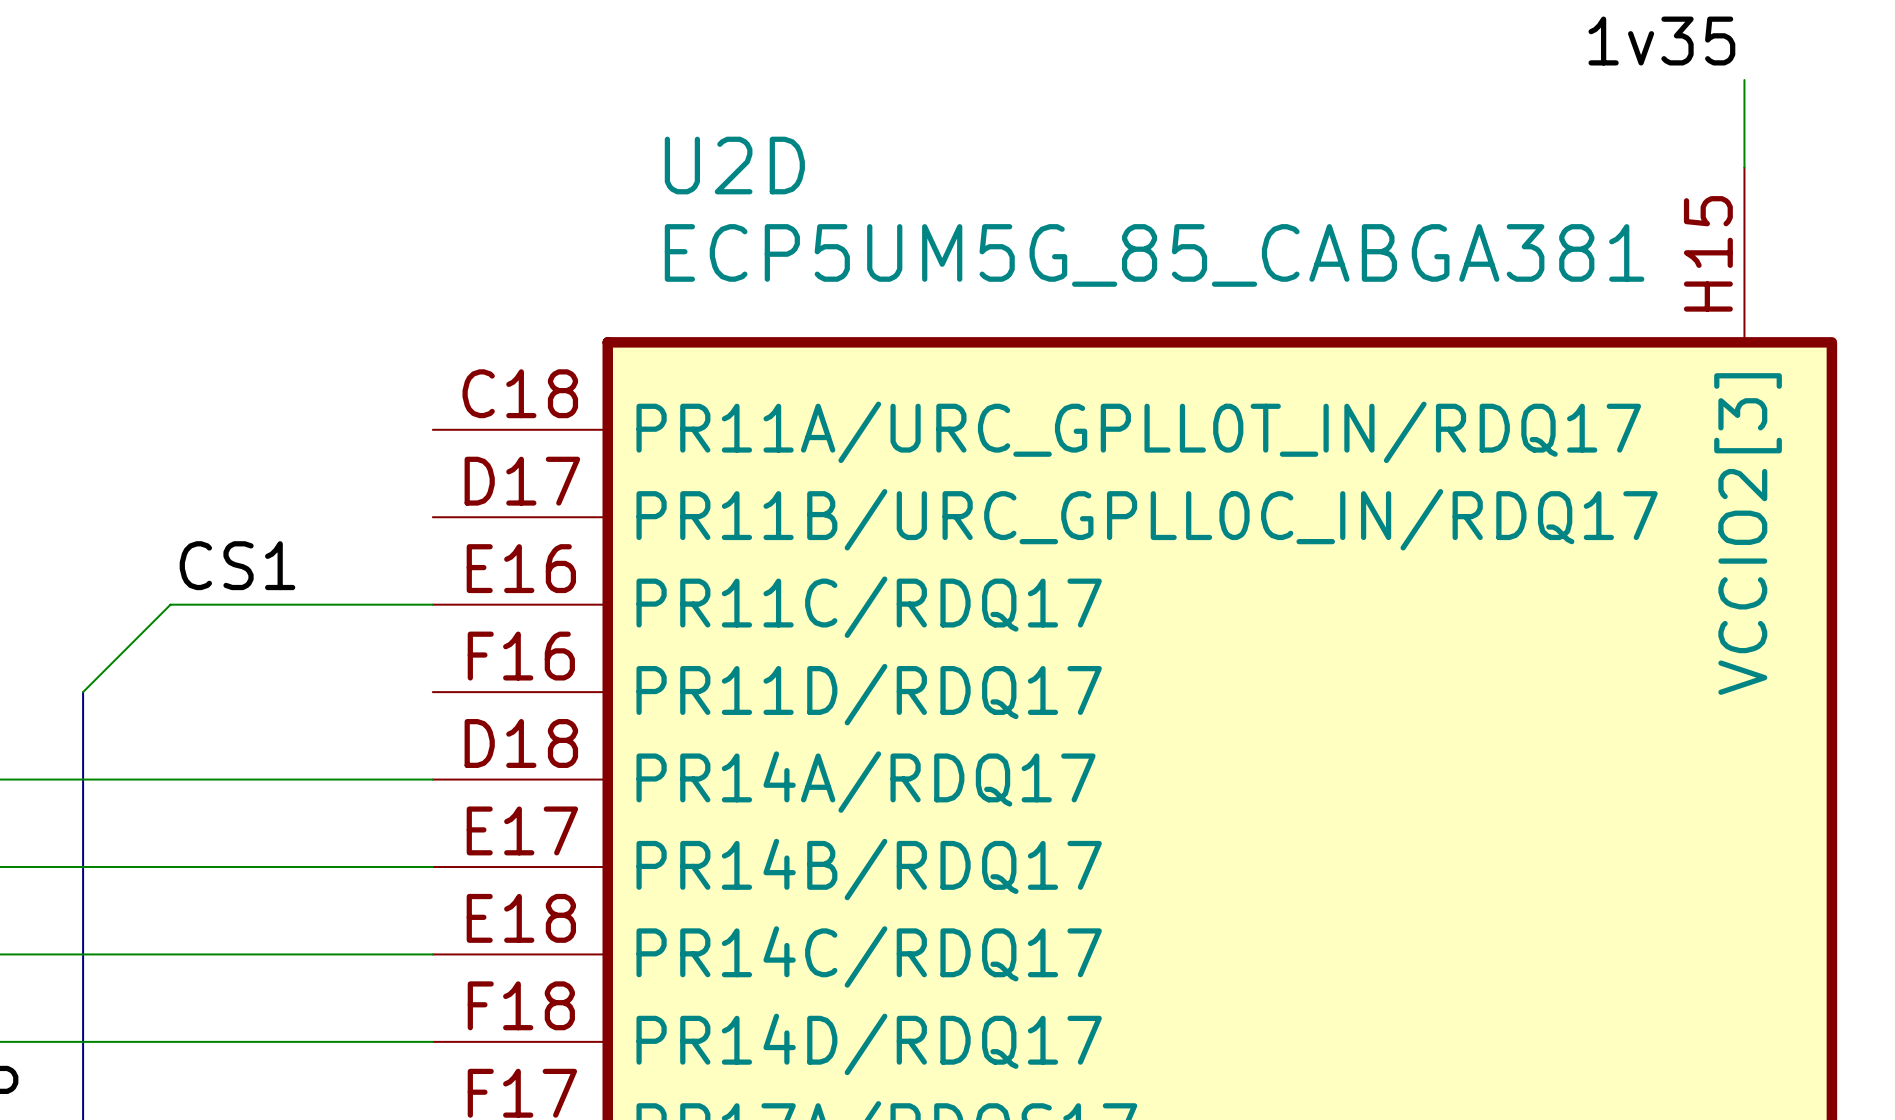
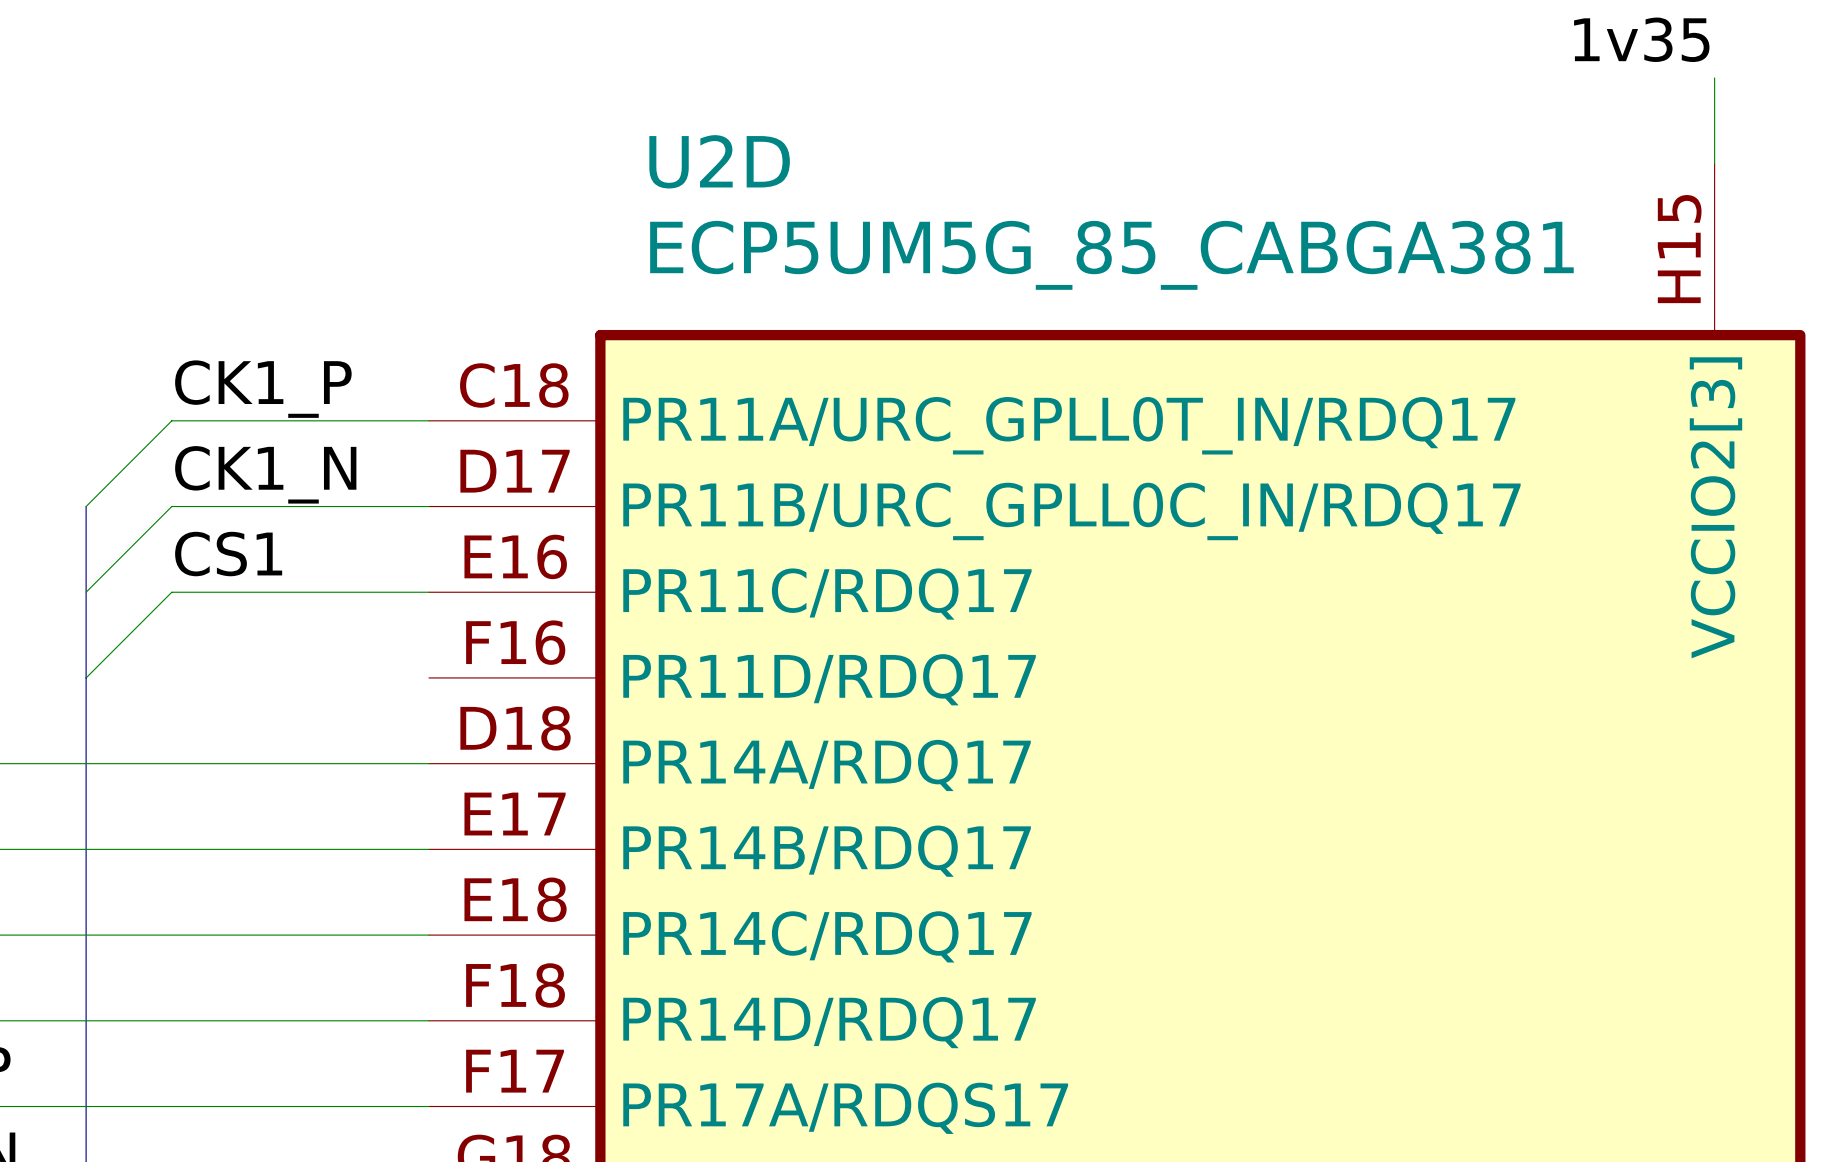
label: none -> CK1_P (263, 389)
wire: none -> (428, 420) (171, 420) (86, 506)
label: none -> CK1_N (265, 474)
bus: none -> (86, 506) (86, 677)
wire: none -> (428, 506) (171, 506) (86, 592)

